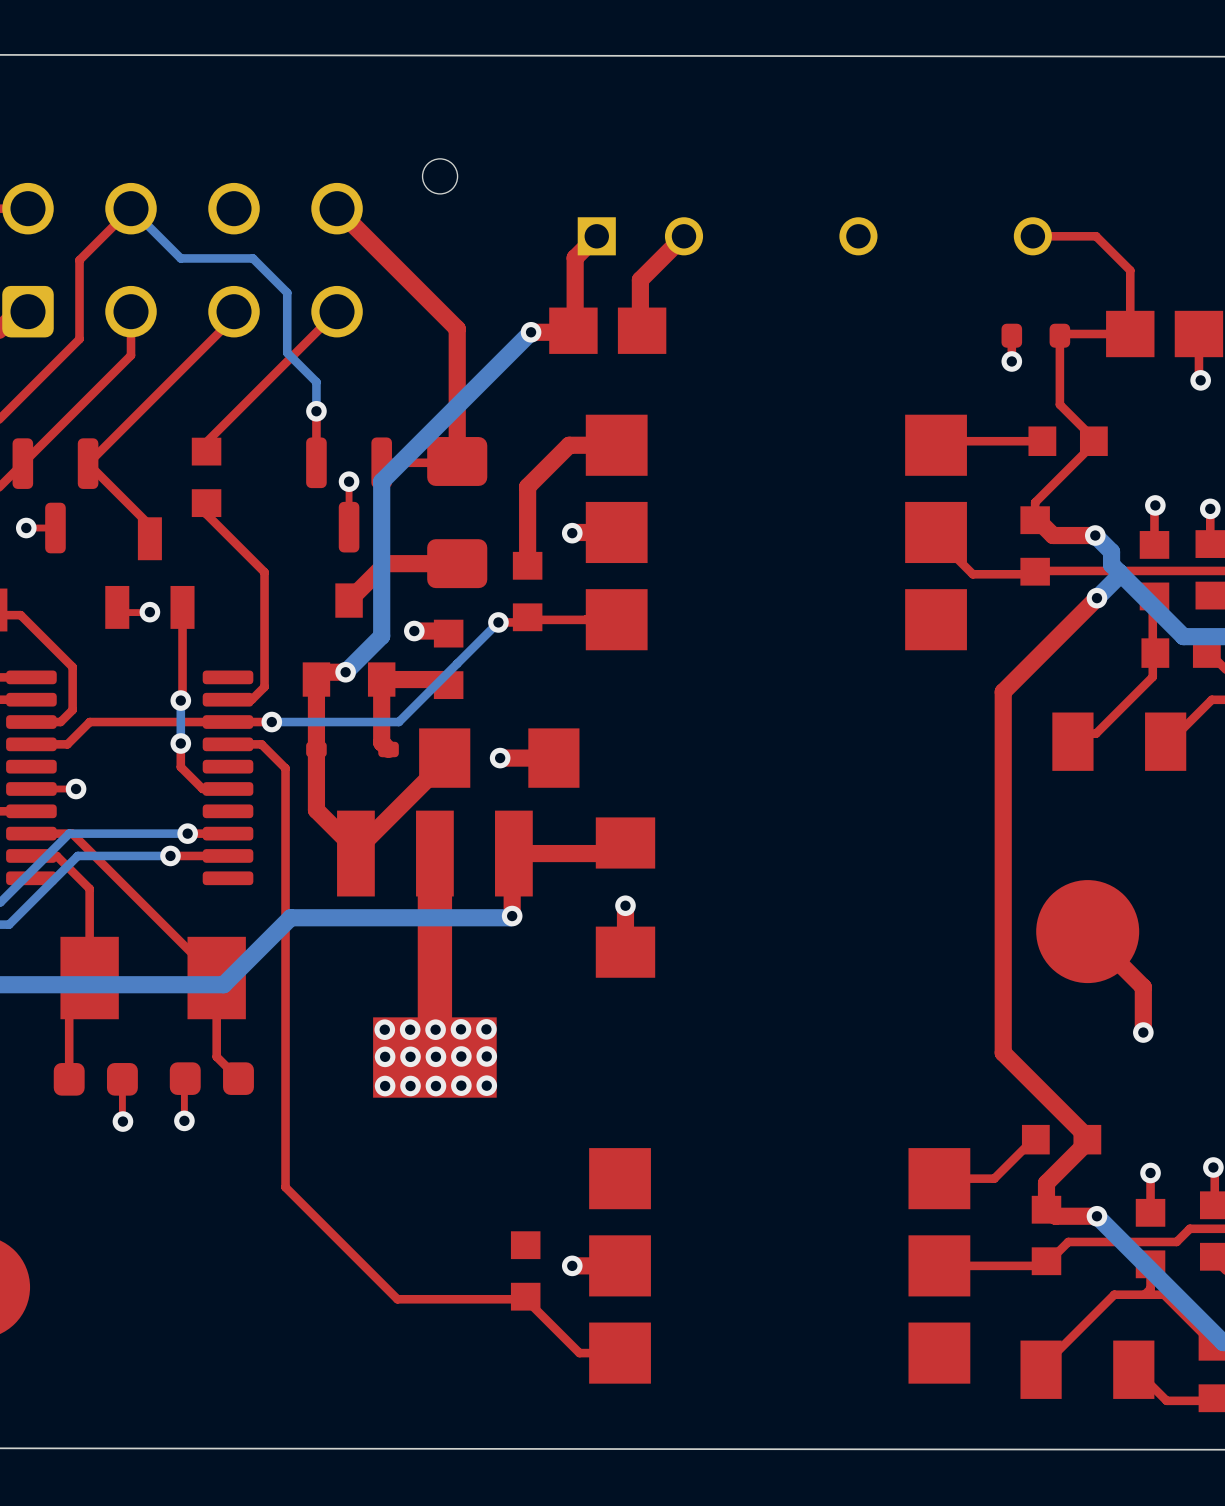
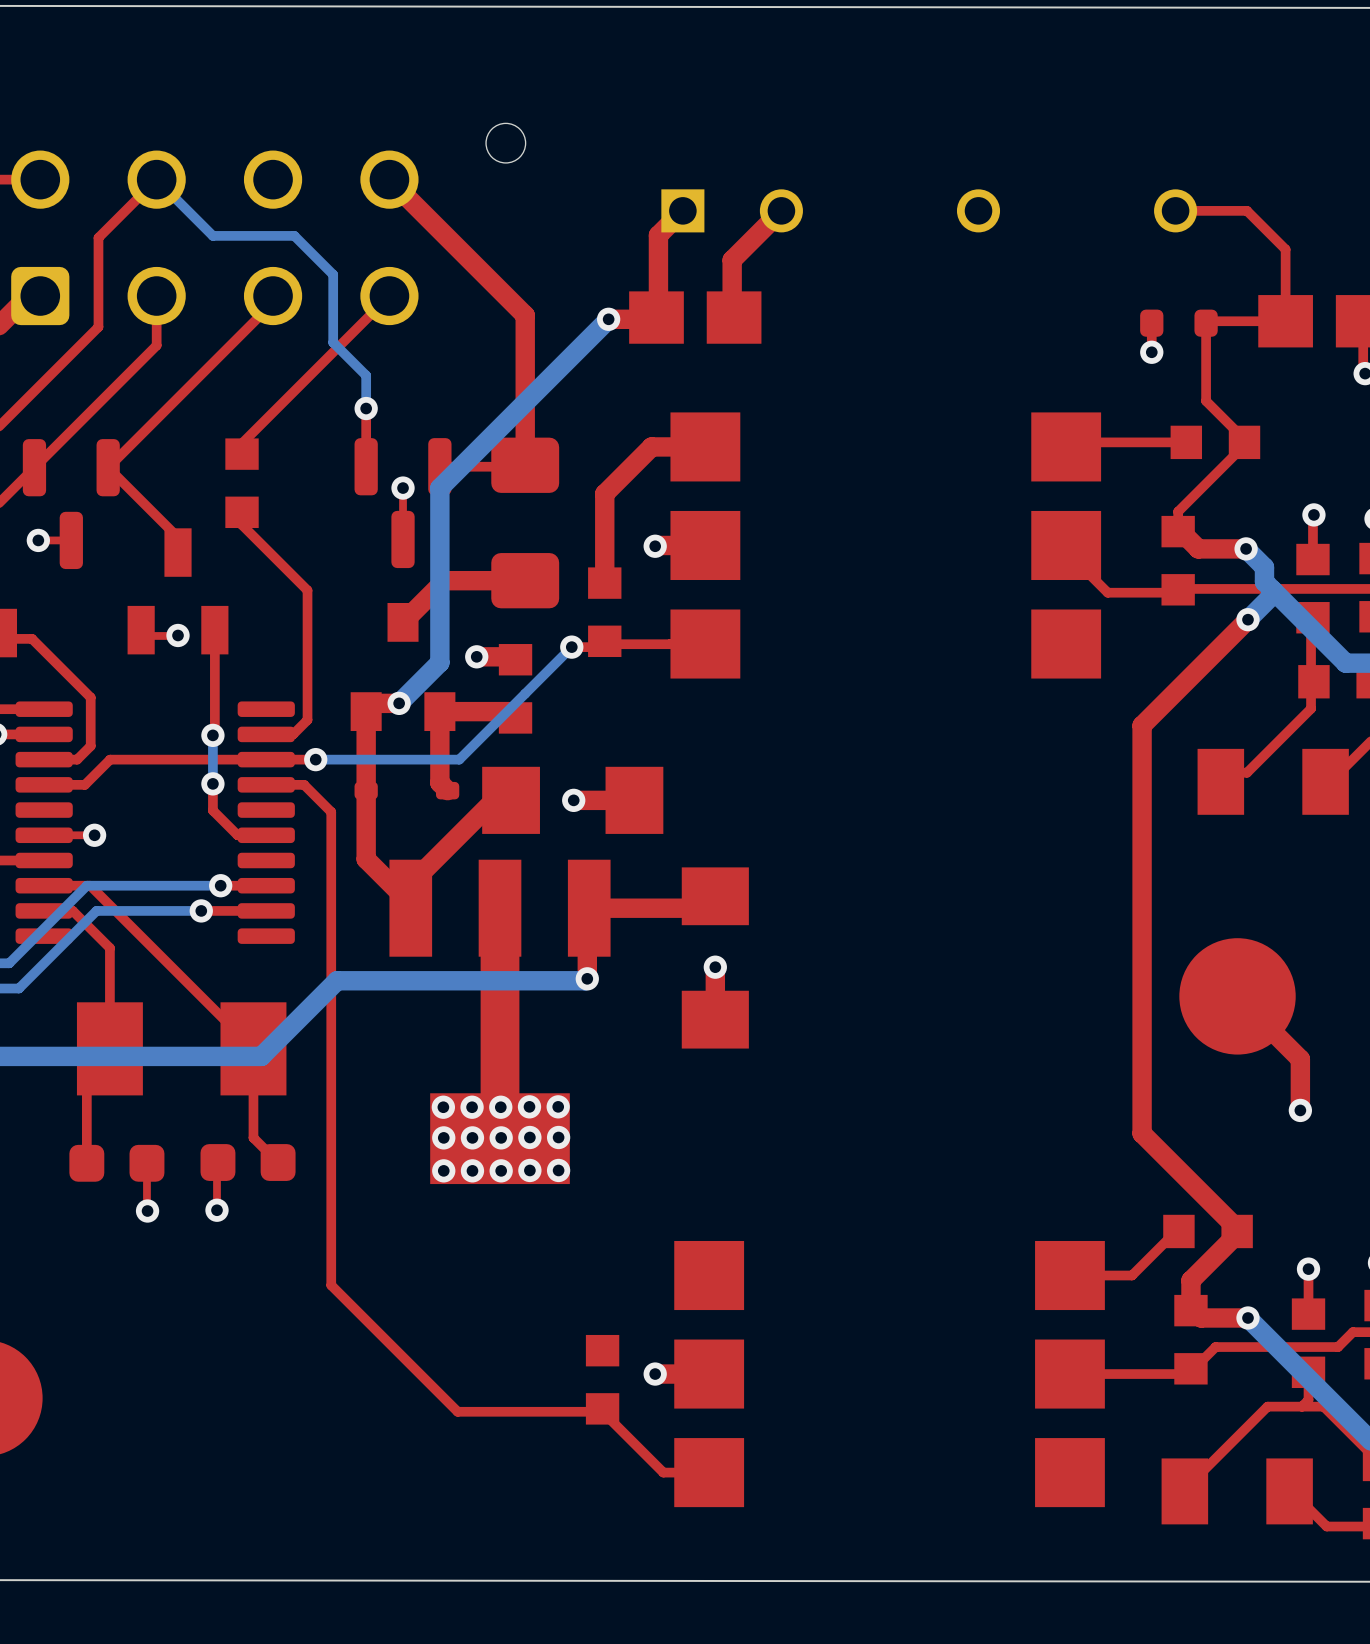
top track: (448, 758) (358, 848) -> (515, 800) (494, 800) (413, 881) (413, 902)

